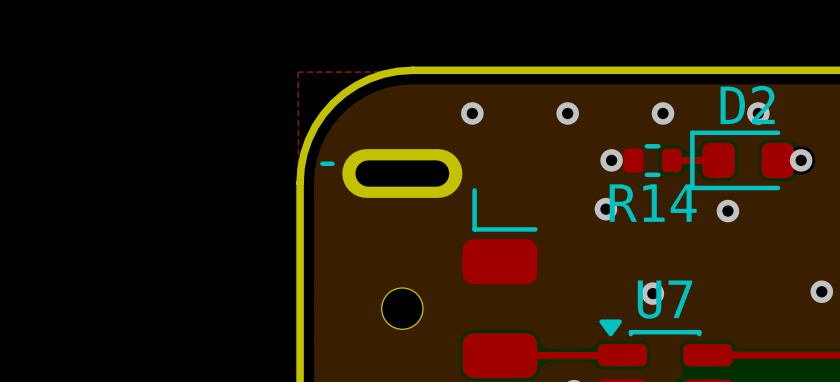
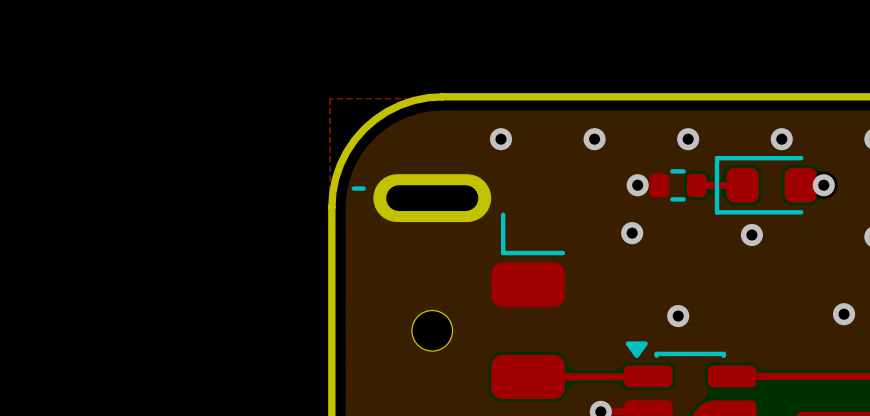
D2 name: D2 (747, 104) -> none
R14 name: R14 (653, 203) -> none
U7 name: U7 (664, 299) -> none

